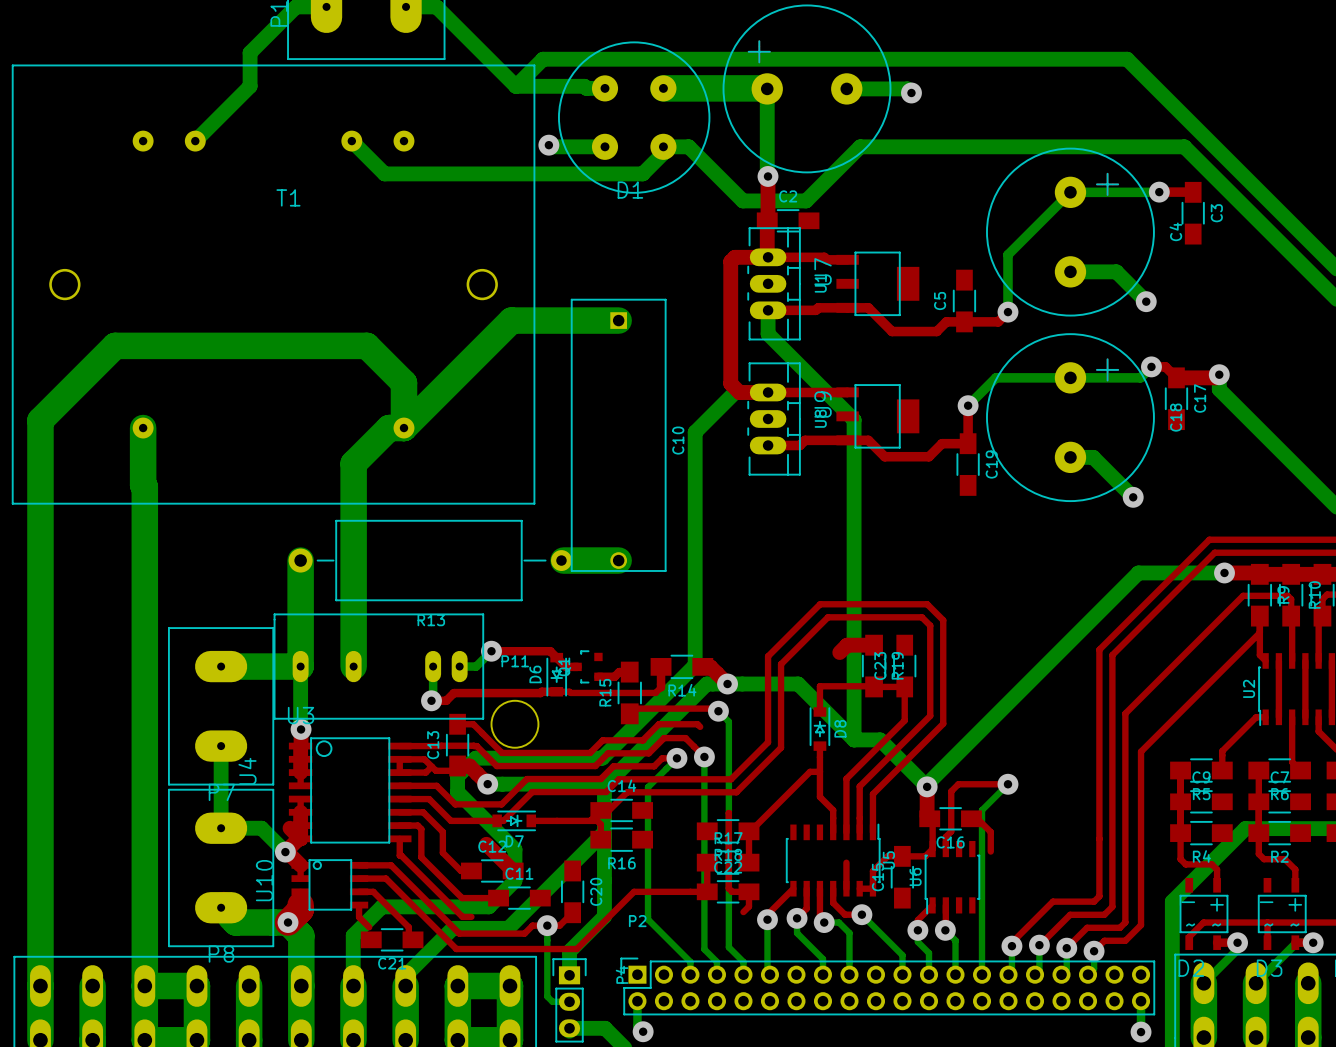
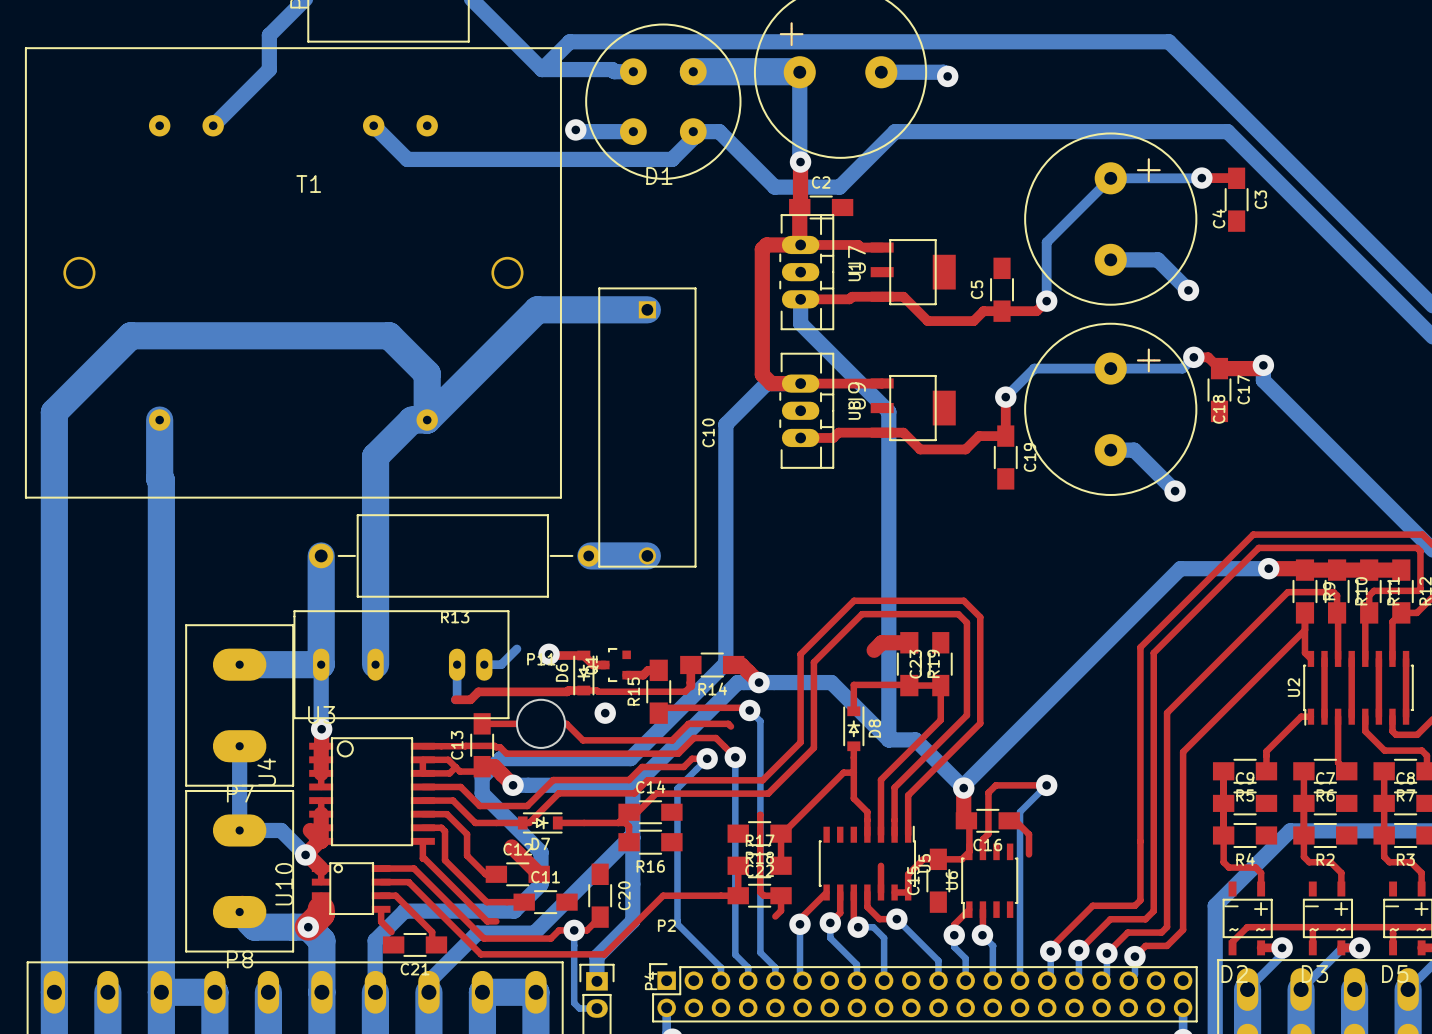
top track: (491, 651) (550, 651) (556, 657) -> (549, 654) (583, 655)
via position: (491, 651) -> (549, 654)
via: (431, 700) -> none
via: none -> (605, 713)
top track: (473, 724) (502, 752) (590, 752) (602, 740) -> (498, 723) (566, 723) (582, 740) (631, 740)
top track: (469, 745) (476, 746) (496, 766) (595, 766) (608, 753) -> (494, 745) (500, 747) (506, 753) (636, 753)

